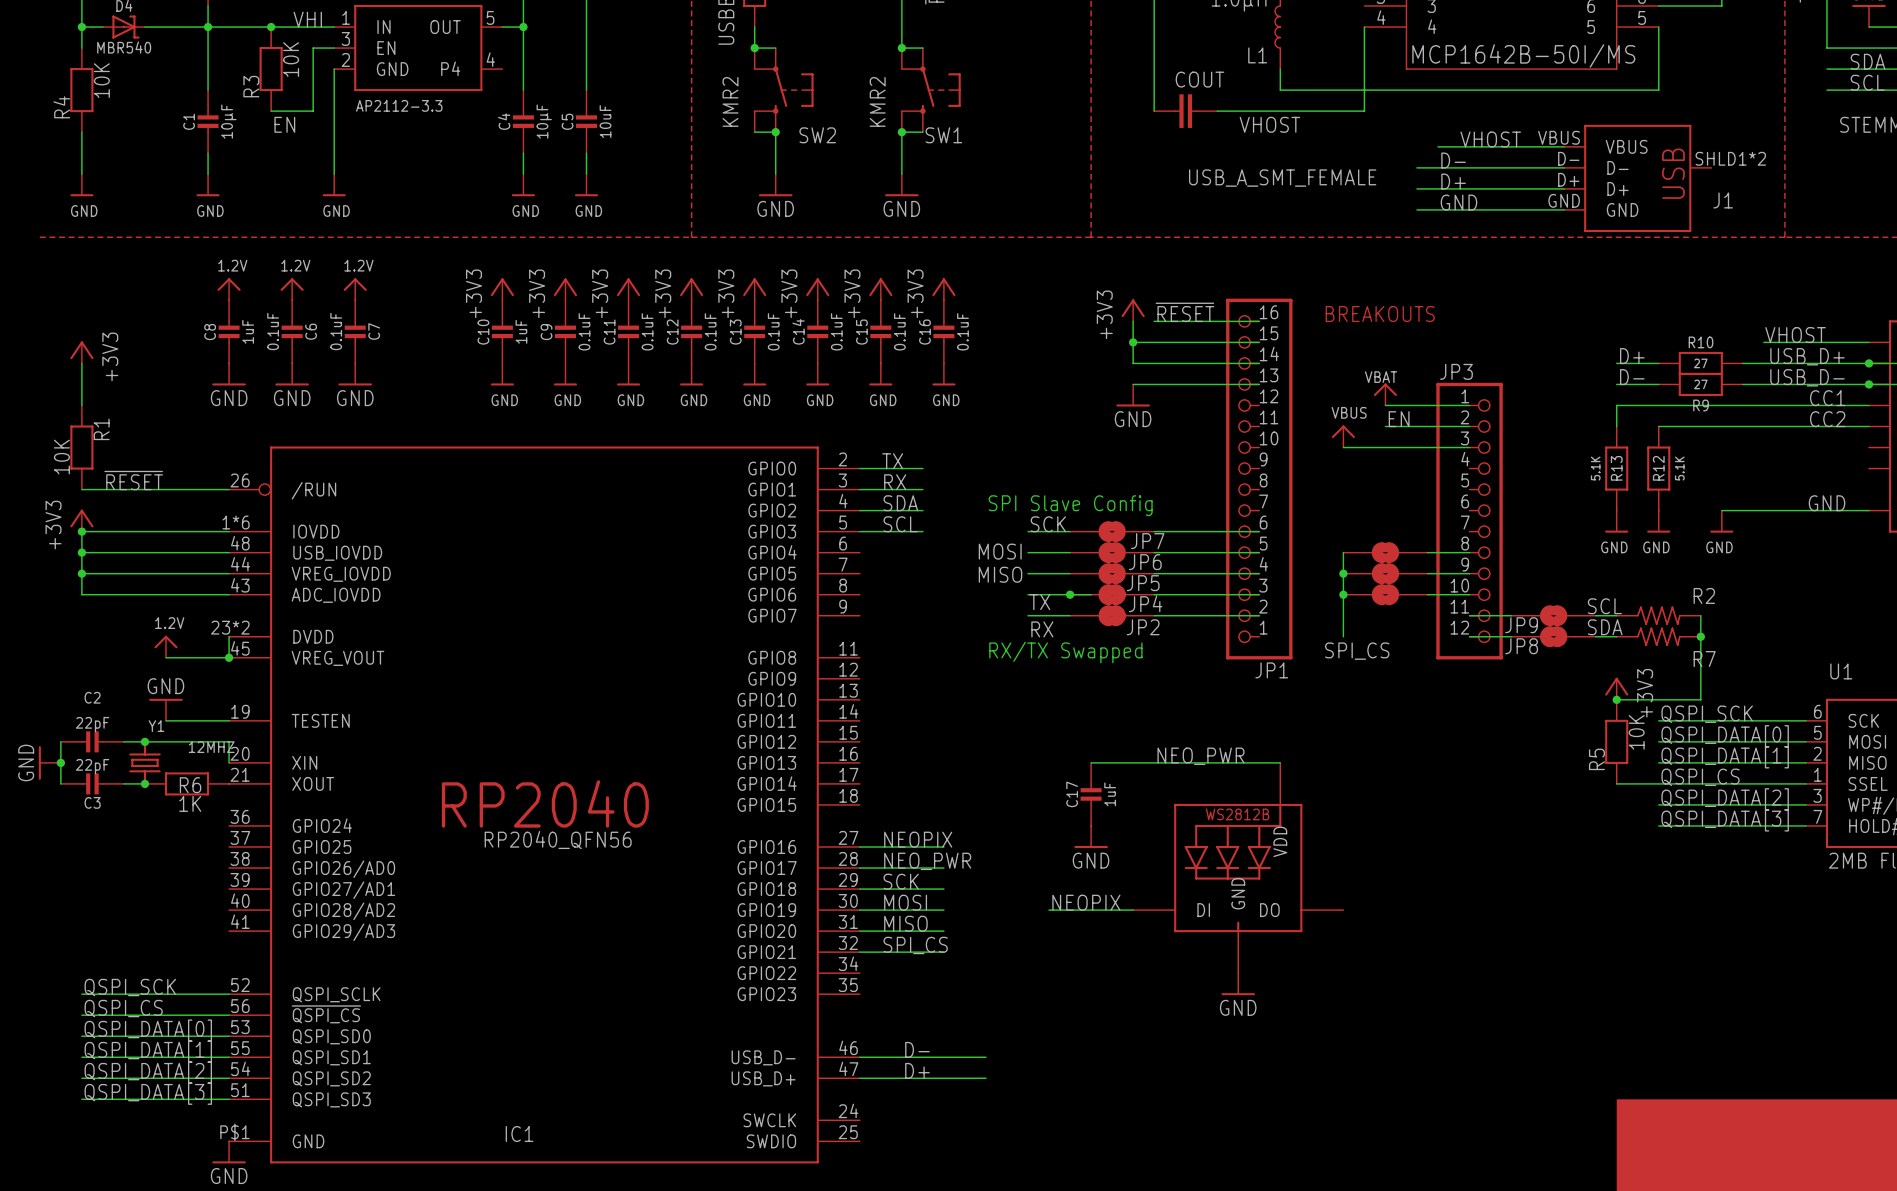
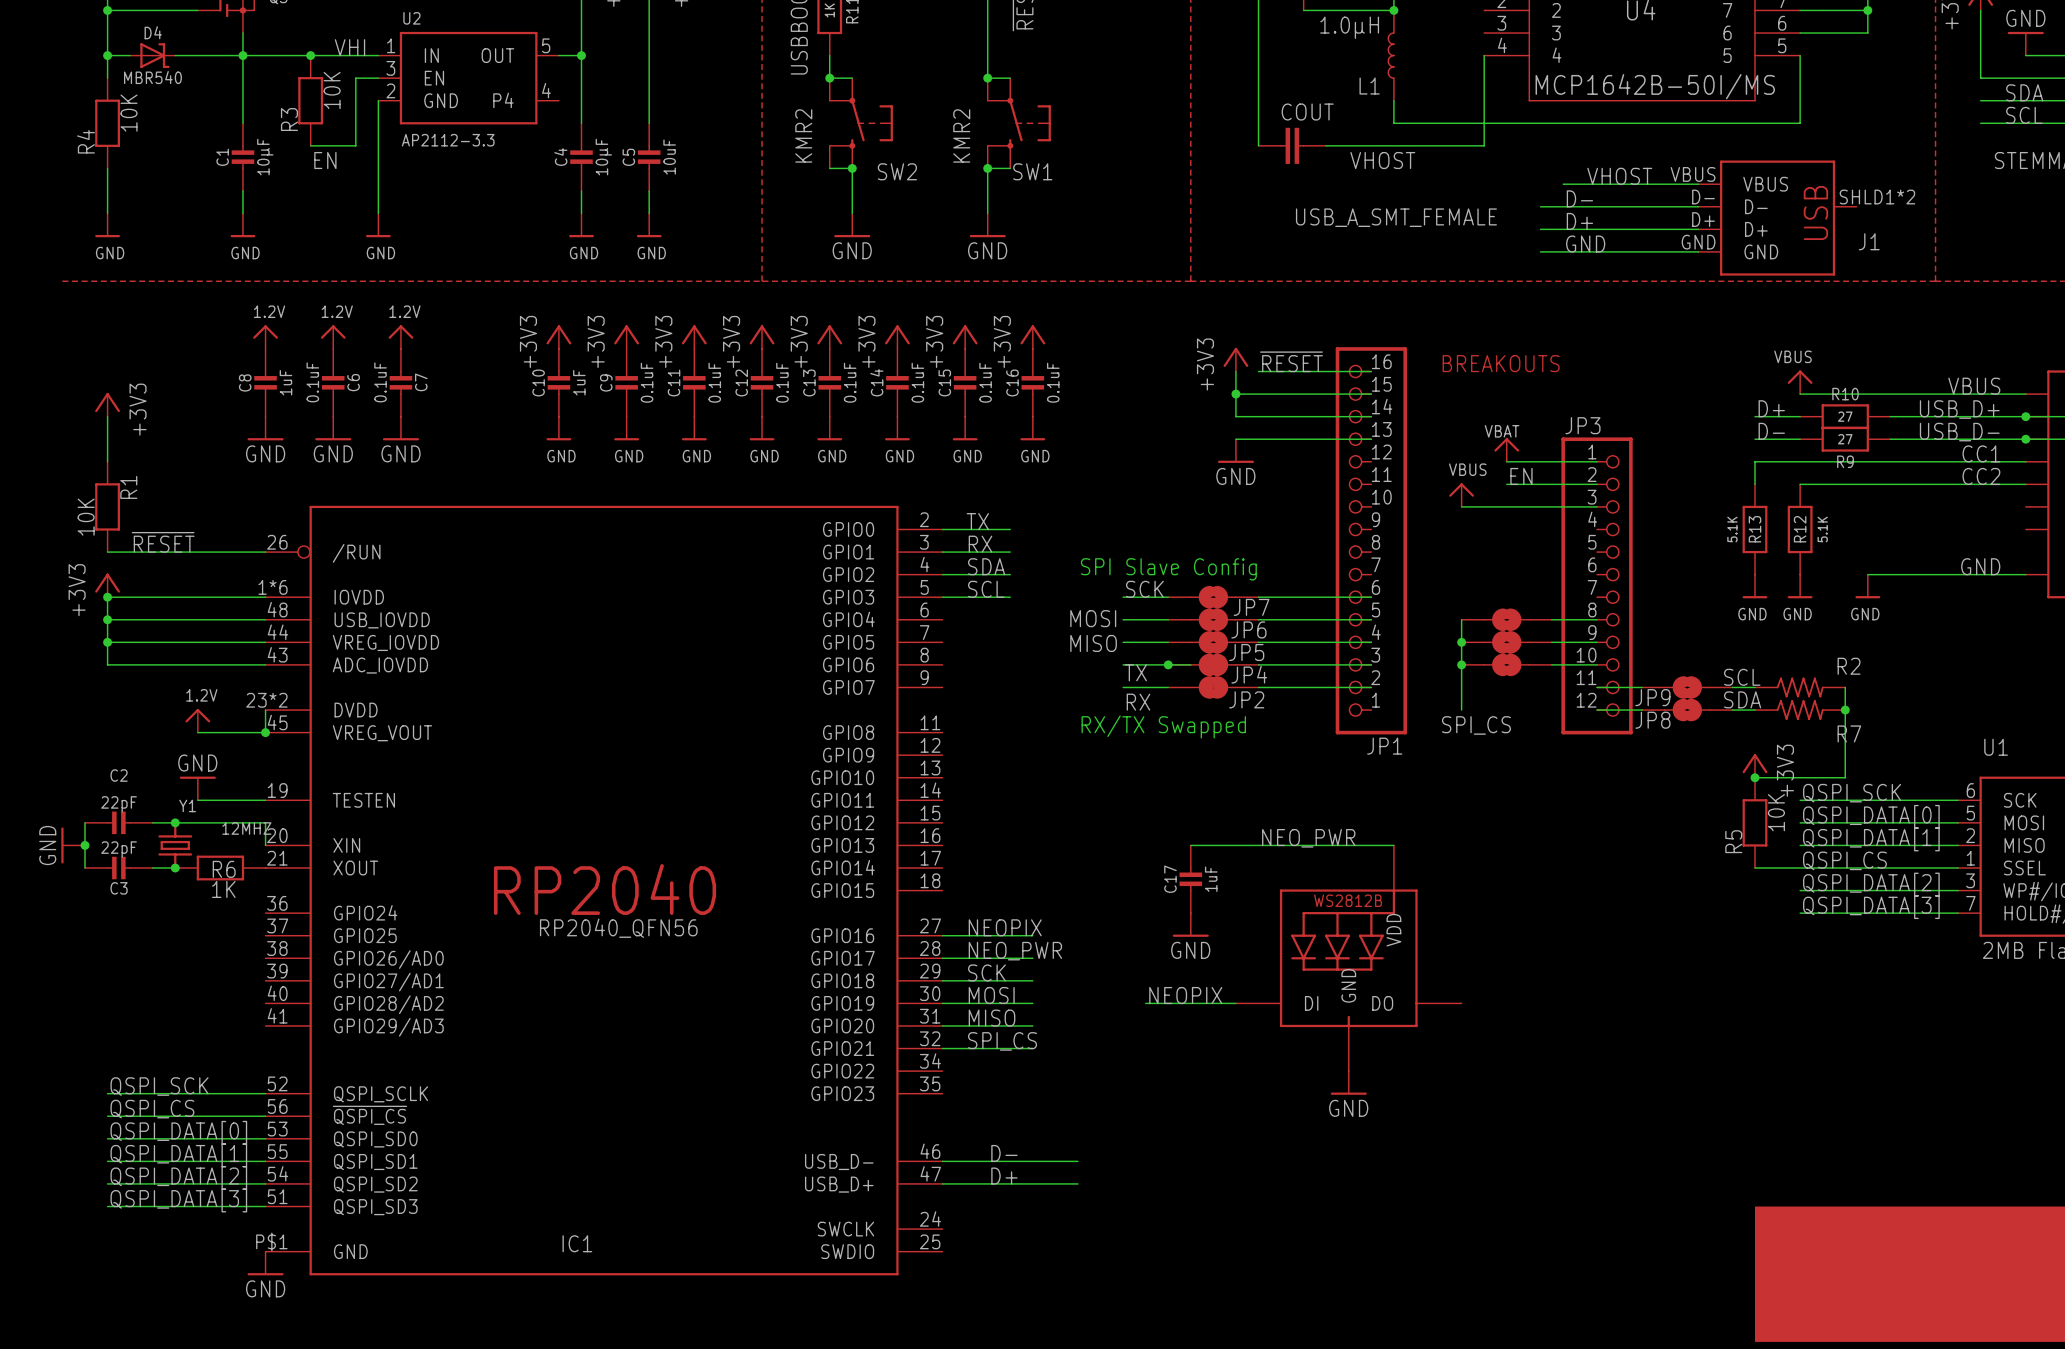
power symbol: none -> VBUS (1800, 382)
label: VHOST (1795, 335) -> none
label: none -> VBUS (1974, 386)
wire: none -> (1800, 394) (1912, 394)

